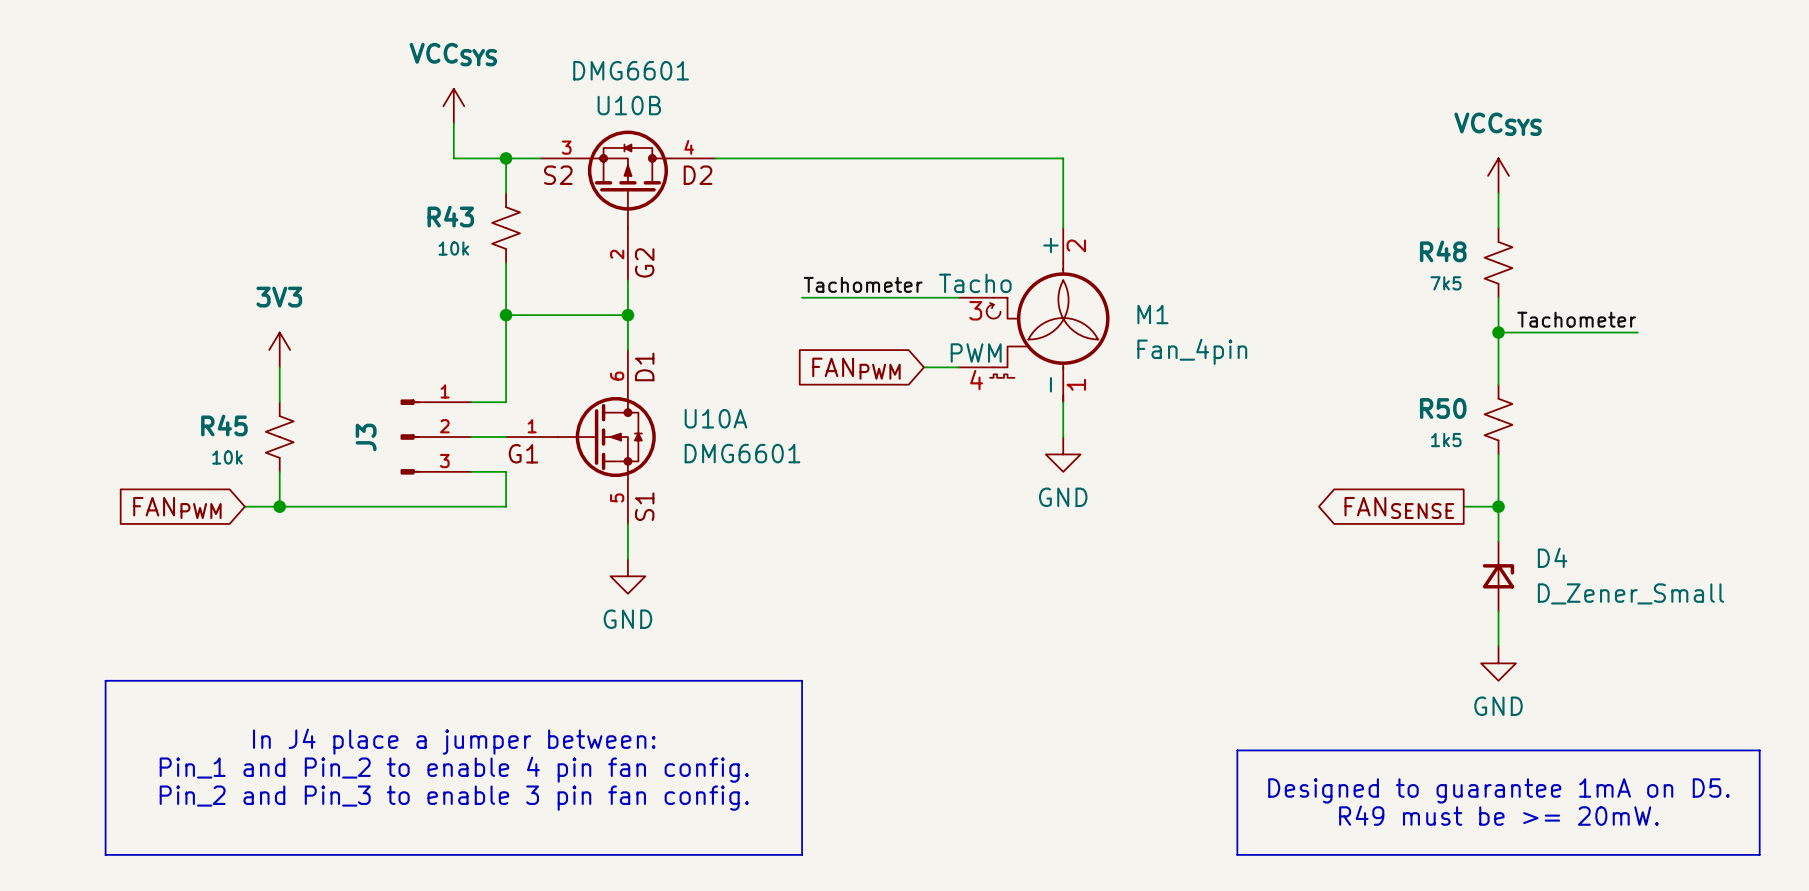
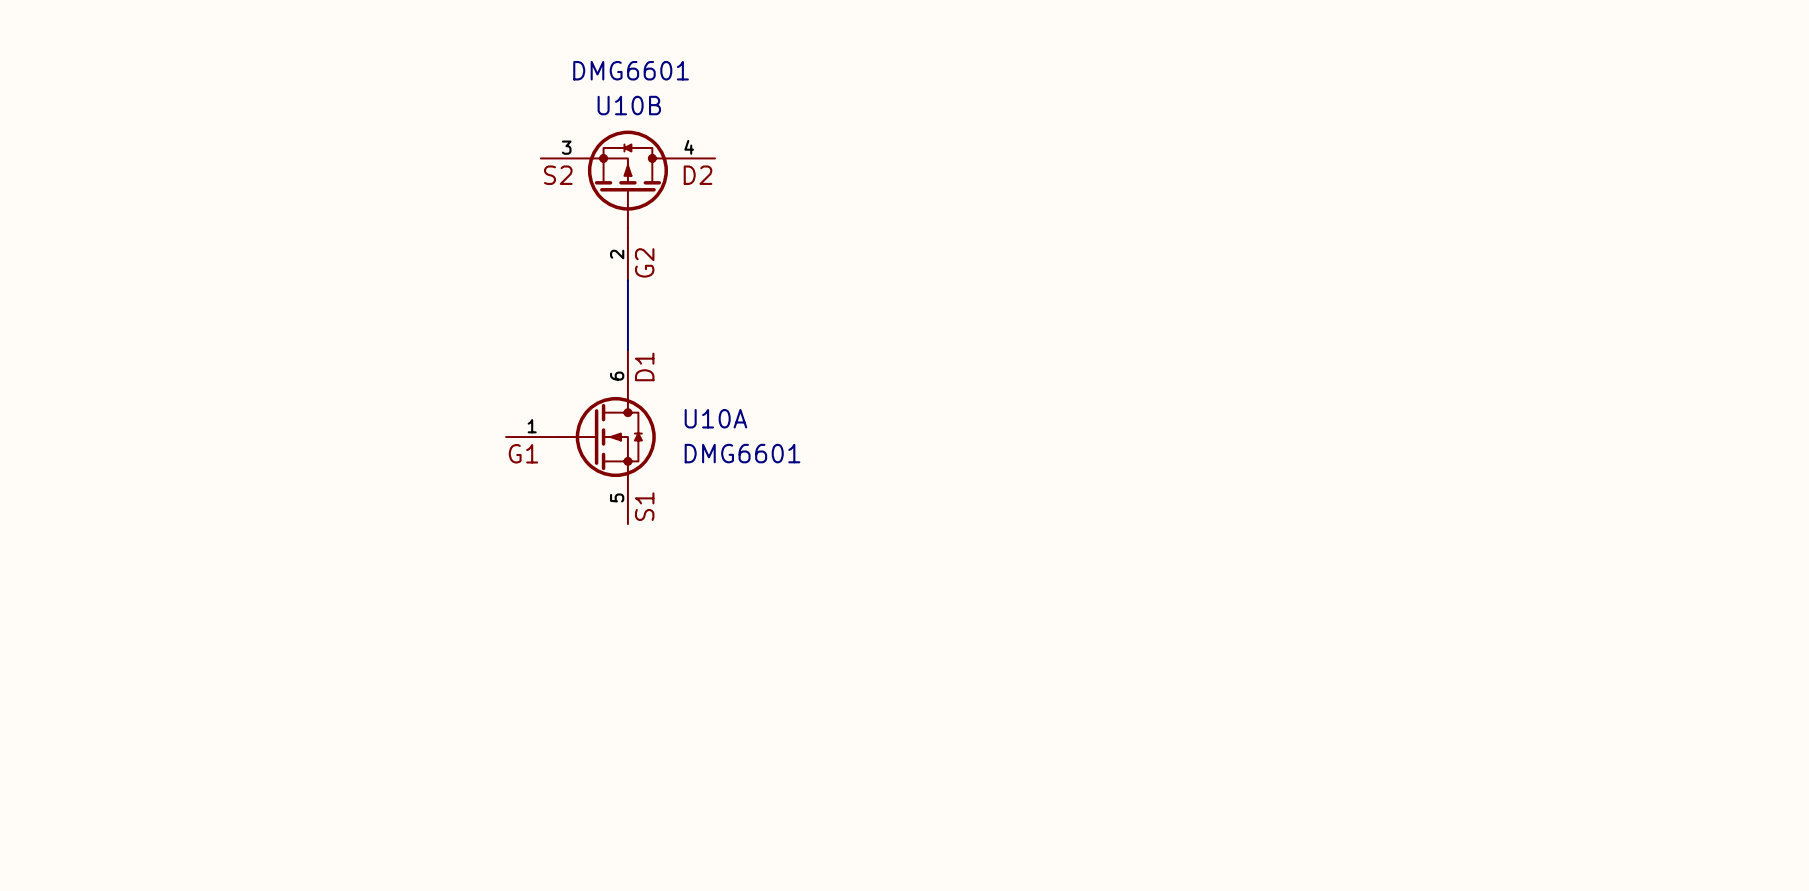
power symbol: VCCSYS (453, 106) -> none
wire: (453, 123) (453, 158) (540, 158) -> none
wire: (506, 158) (506, 193) -> none
junction: (506, 158) -> none
wire: (715, 158) (1063, 158) (1063, 228) -> none
power symbol: VCCSYS (1498, 175) -> none
wire: (1498, 193) (1498, 228) -> none
R43: 10k (506, 228) -> none
wire: (506, 262) (506, 402) (471, 402) -> none
R48: 7k5 (1498, 262) -> none
label: Tachometer (863, 284) -> none
wire: (802, 297) (958, 297) -> none
wire: (1498, 297) (1498, 384) -> none
wire: (506, 315) (627, 315) -> none
junction: (506, 315) -> none
junction: (627, 315) -> none
M1: Fan_4pin (1034, 315) -> none
label: Tachometer (1576, 319) -> none
wire: (1498, 332) (1637, 332) -> none
junction: (1498, 332) -> none
power symbol: 3V3 (279, 349) -> none
wire: (279, 367) (279, 402) -> none
wire: (923, 367) (958, 367) -> none
global label: FANPWM (856, 368) -> none
wire: (1063, 402) (1063, 437) -> none
R50: 1k5 (1498, 419) -> none
R45: 10k (279, 437) -> none
J3: (435, 437) -> none
wire: (471, 437) (506, 437) -> none
power symbol: GND (1063, 454) -> none
wire: (1498, 454) (1498, 541) -> none
wire: (279, 471) (279, 506) -> none
wire: (471, 471) (506, 471) (506, 506) (244, 506) -> none
junction: (279, 506) -> none
wire: (1463, 506) (1498, 506) -> none
junction: (1498, 506) -> none
global label: FANPWM (177, 507) -> none
global label: FANSENSE (1399, 507) -> none
wire: (627, 524) (627, 558) -> none
power symbol: GND (627, 576) -> none
D4: D_Zener_Small (1498, 576) -> none
wire: (1498, 611) (1498, 645) -> none
power symbol: GND (1498, 663) -> none
line: (105, 680) (802, 680) (802, 854) (105, 854) (105, 680) -> none
text: In J4 place a jumper between: (454, 741) -> none
line: (1237, 750) (1759, 750) (1759, 854) (1237, 854) (1237, 750) -> none
text: Pin_1 and Pin_2 to enable 4 pin fan config. (454, 769) -> none
text: Designed to guarantee 1mA on D5. (1498, 790) -> none
text: Pin_2 and Pin_3 to enable 3 pin fan config. (454, 798) -> none
text: R49 must be >= 20mW. (1498, 815) -> none

